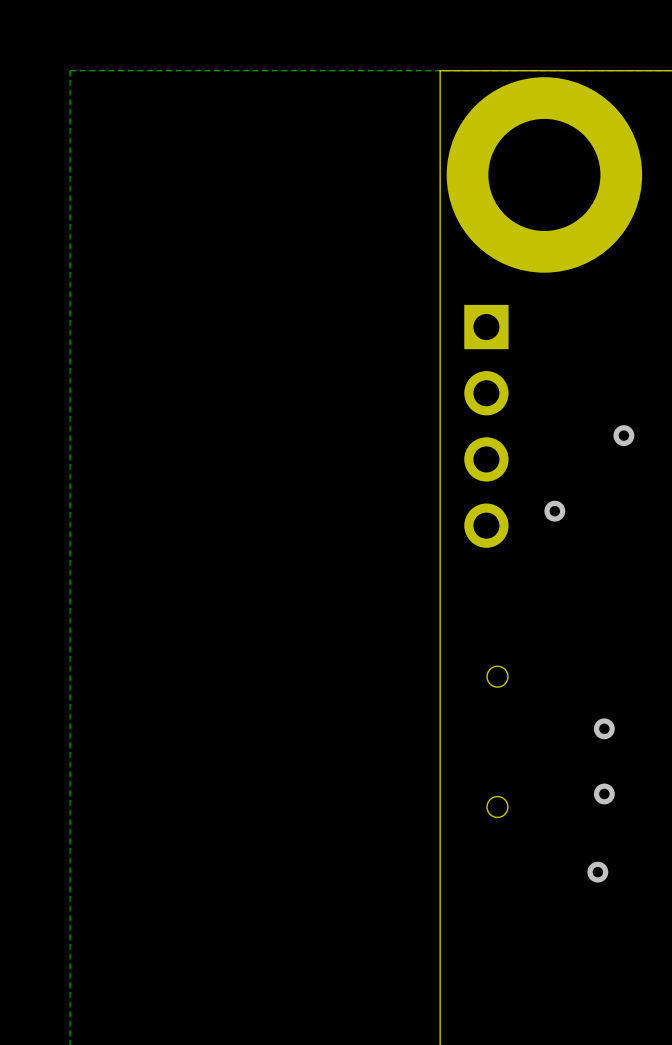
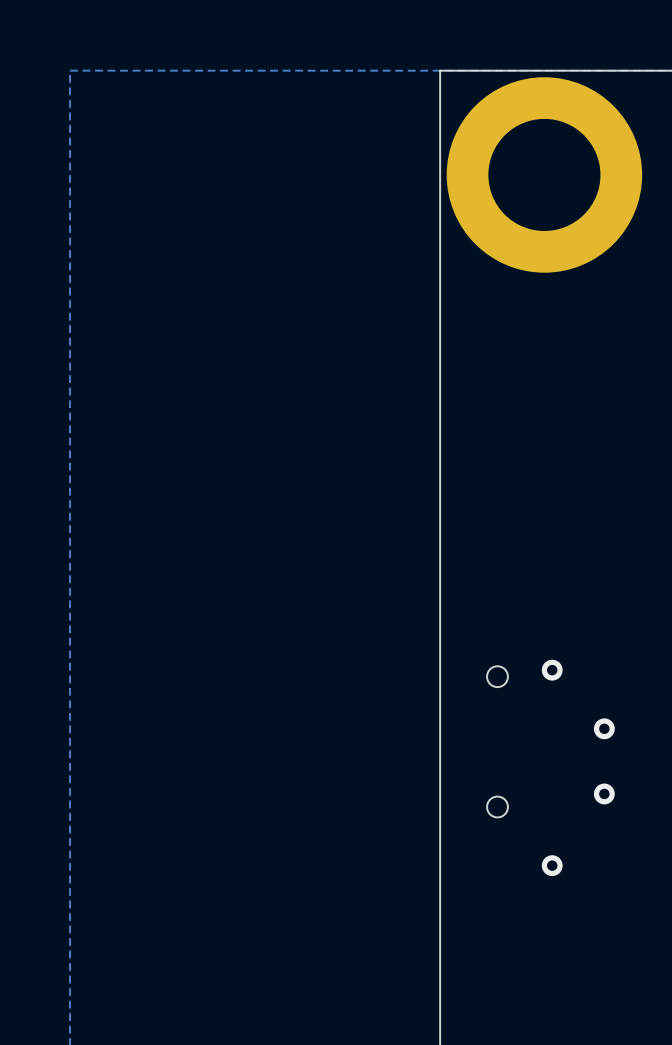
part: (486, 426) -> none
via: (623, 435) -> none
via: (554, 511) -> none
via: none -> (552, 670)
via position: (597, 872) -> (552, 865)

